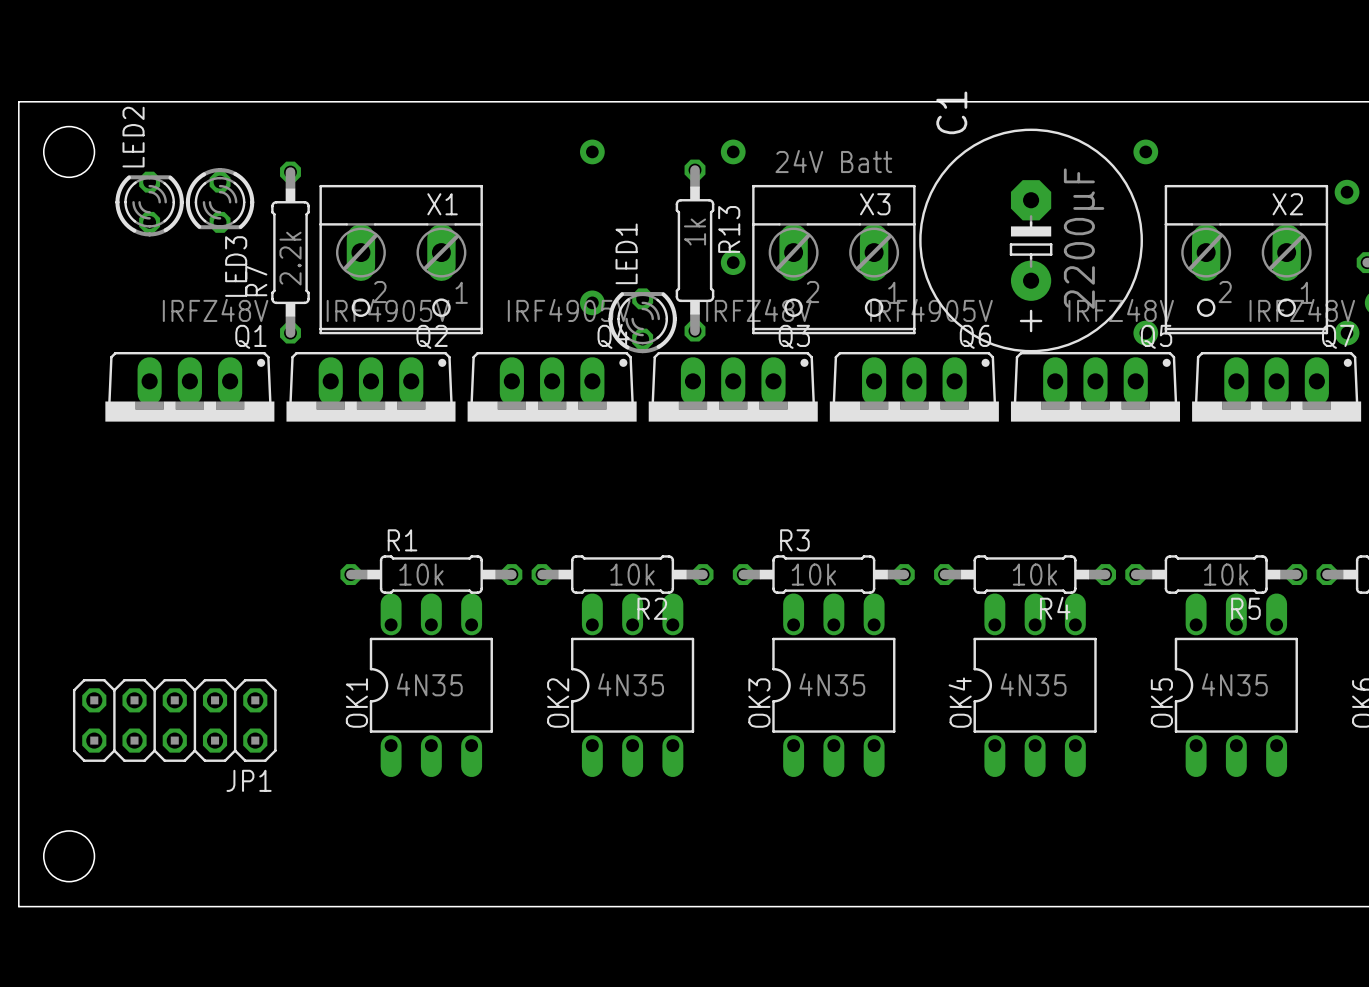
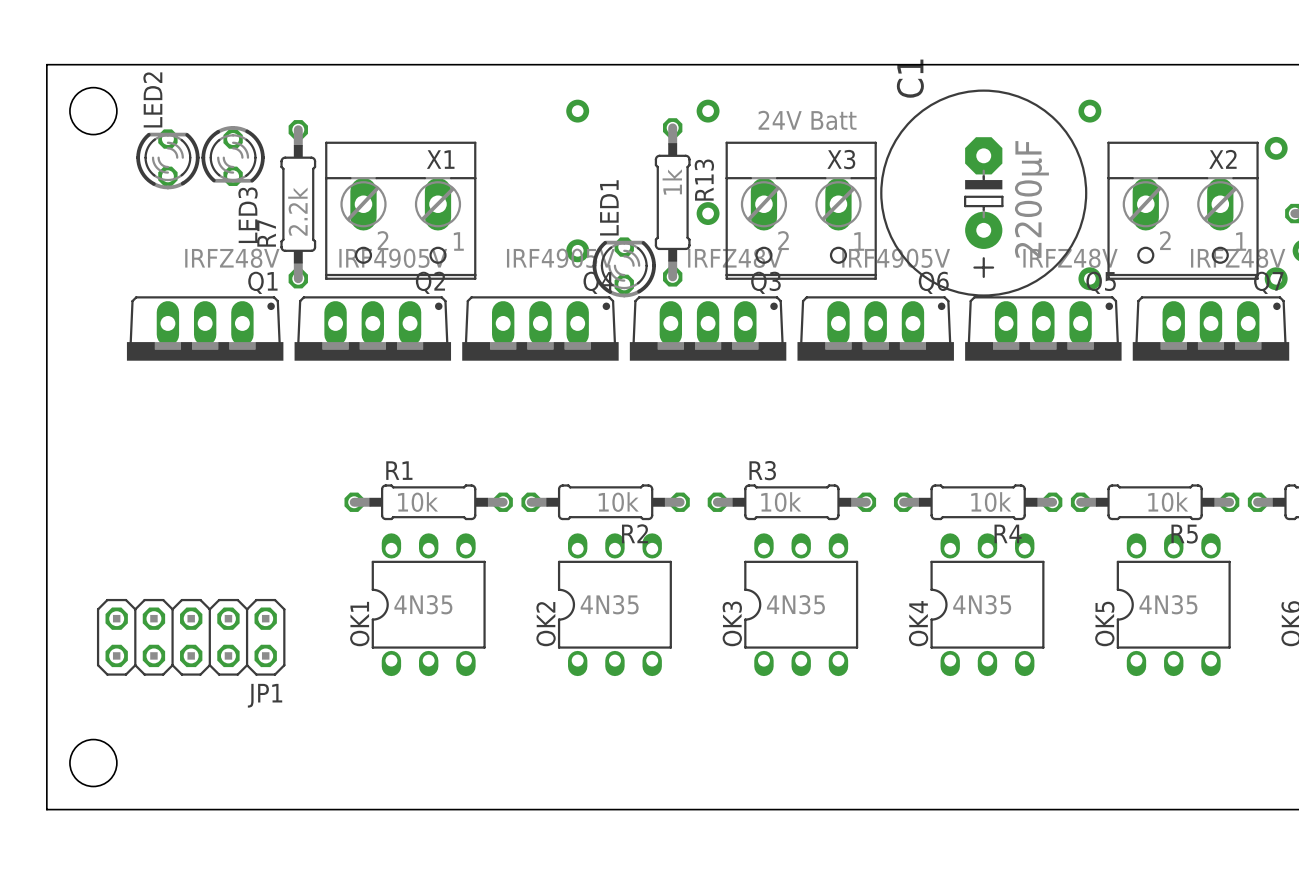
OK1 footprint: [369, 593, 493, 778] -> [371, 533, 486, 677]
OK2 footprint: [571, 593, 695, 778] -> [557, 533, 672, 677]
OK3 footprint: [772, 593, 896, 778] -> [744, 533, 859, 677]
OK4 footprint: [973, 593, 1097, 778] -> [930, 533, 1045, 677]
OK5 footprint: [1174, 593, 1298, 778] -> [1116, 533, 1231, 677]

